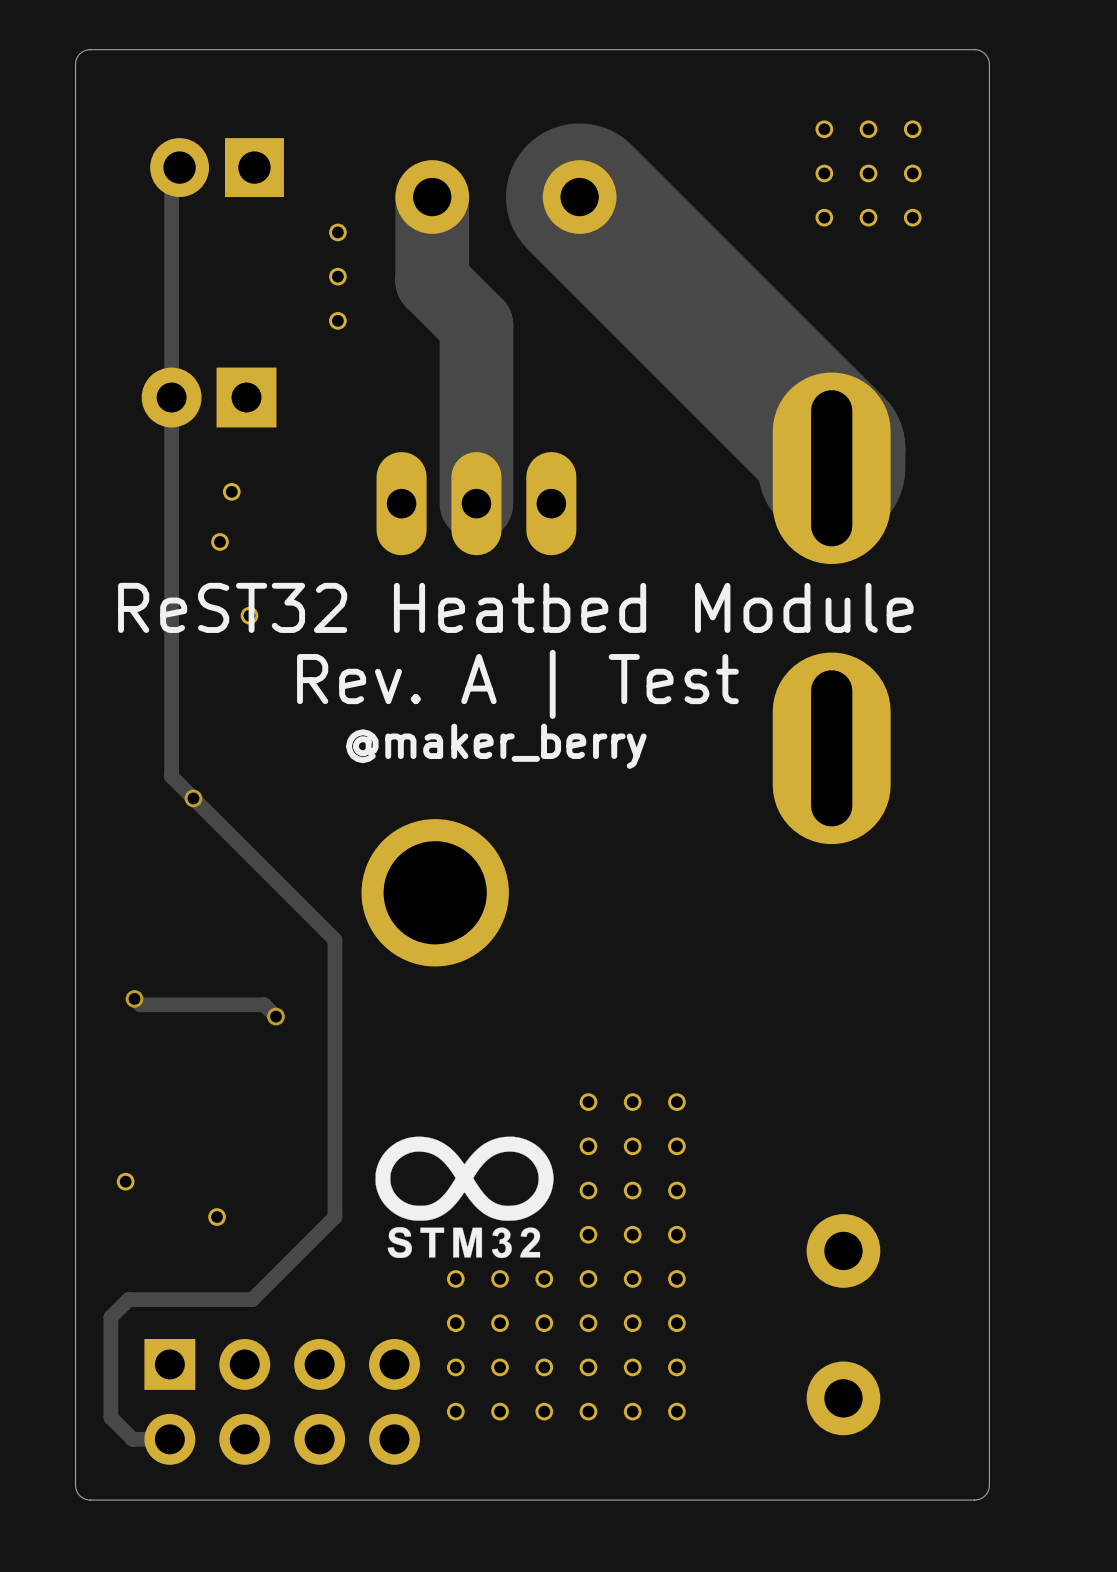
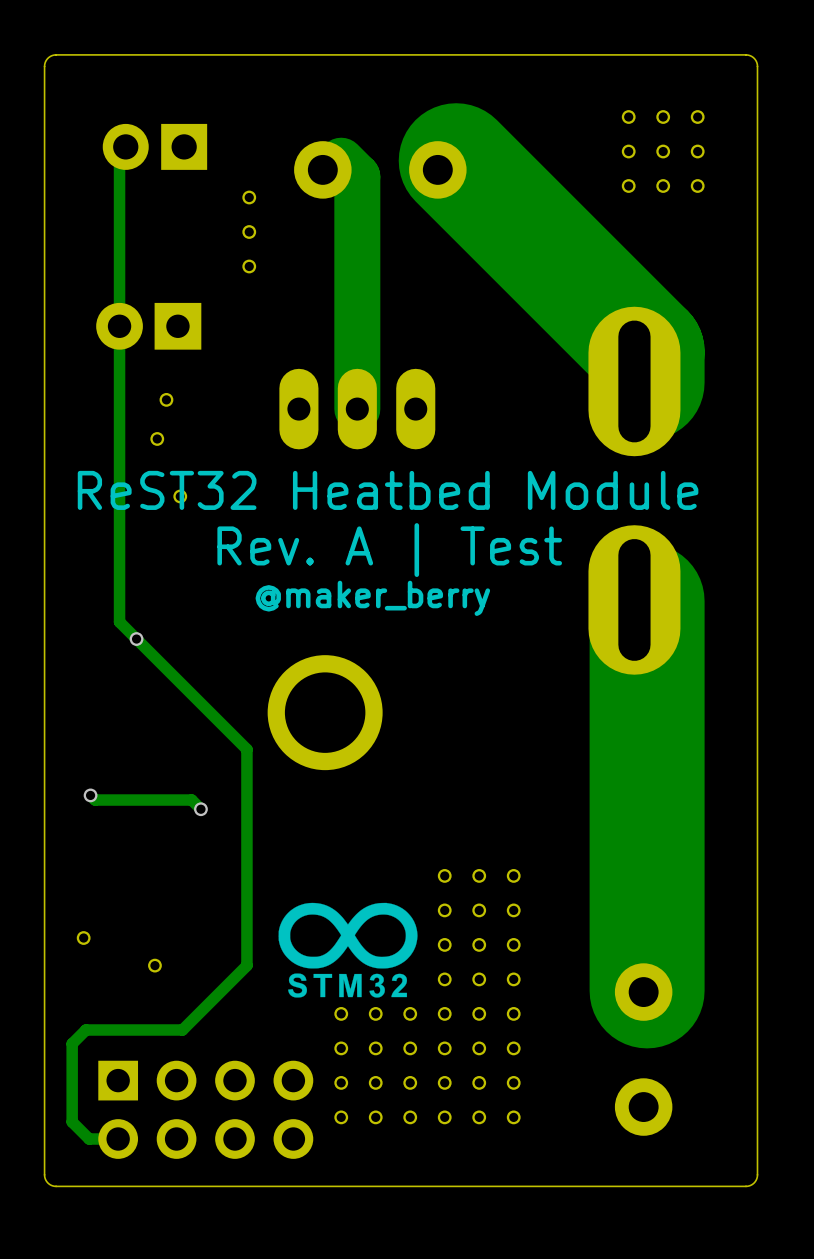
track: none -> (456, 160) (647, 351) (647, 382)
track: (432, 197) (432, 281) (476, 325) -> (341, 160) (357, 176) (357, 269)
track: (579, 197) (831, 449) (831, 468) -> none
track width: thick (476, 325) (476, 503) -> thin (357, 269) (357, 409)
track: none -> (647, 601) (647, 990)

